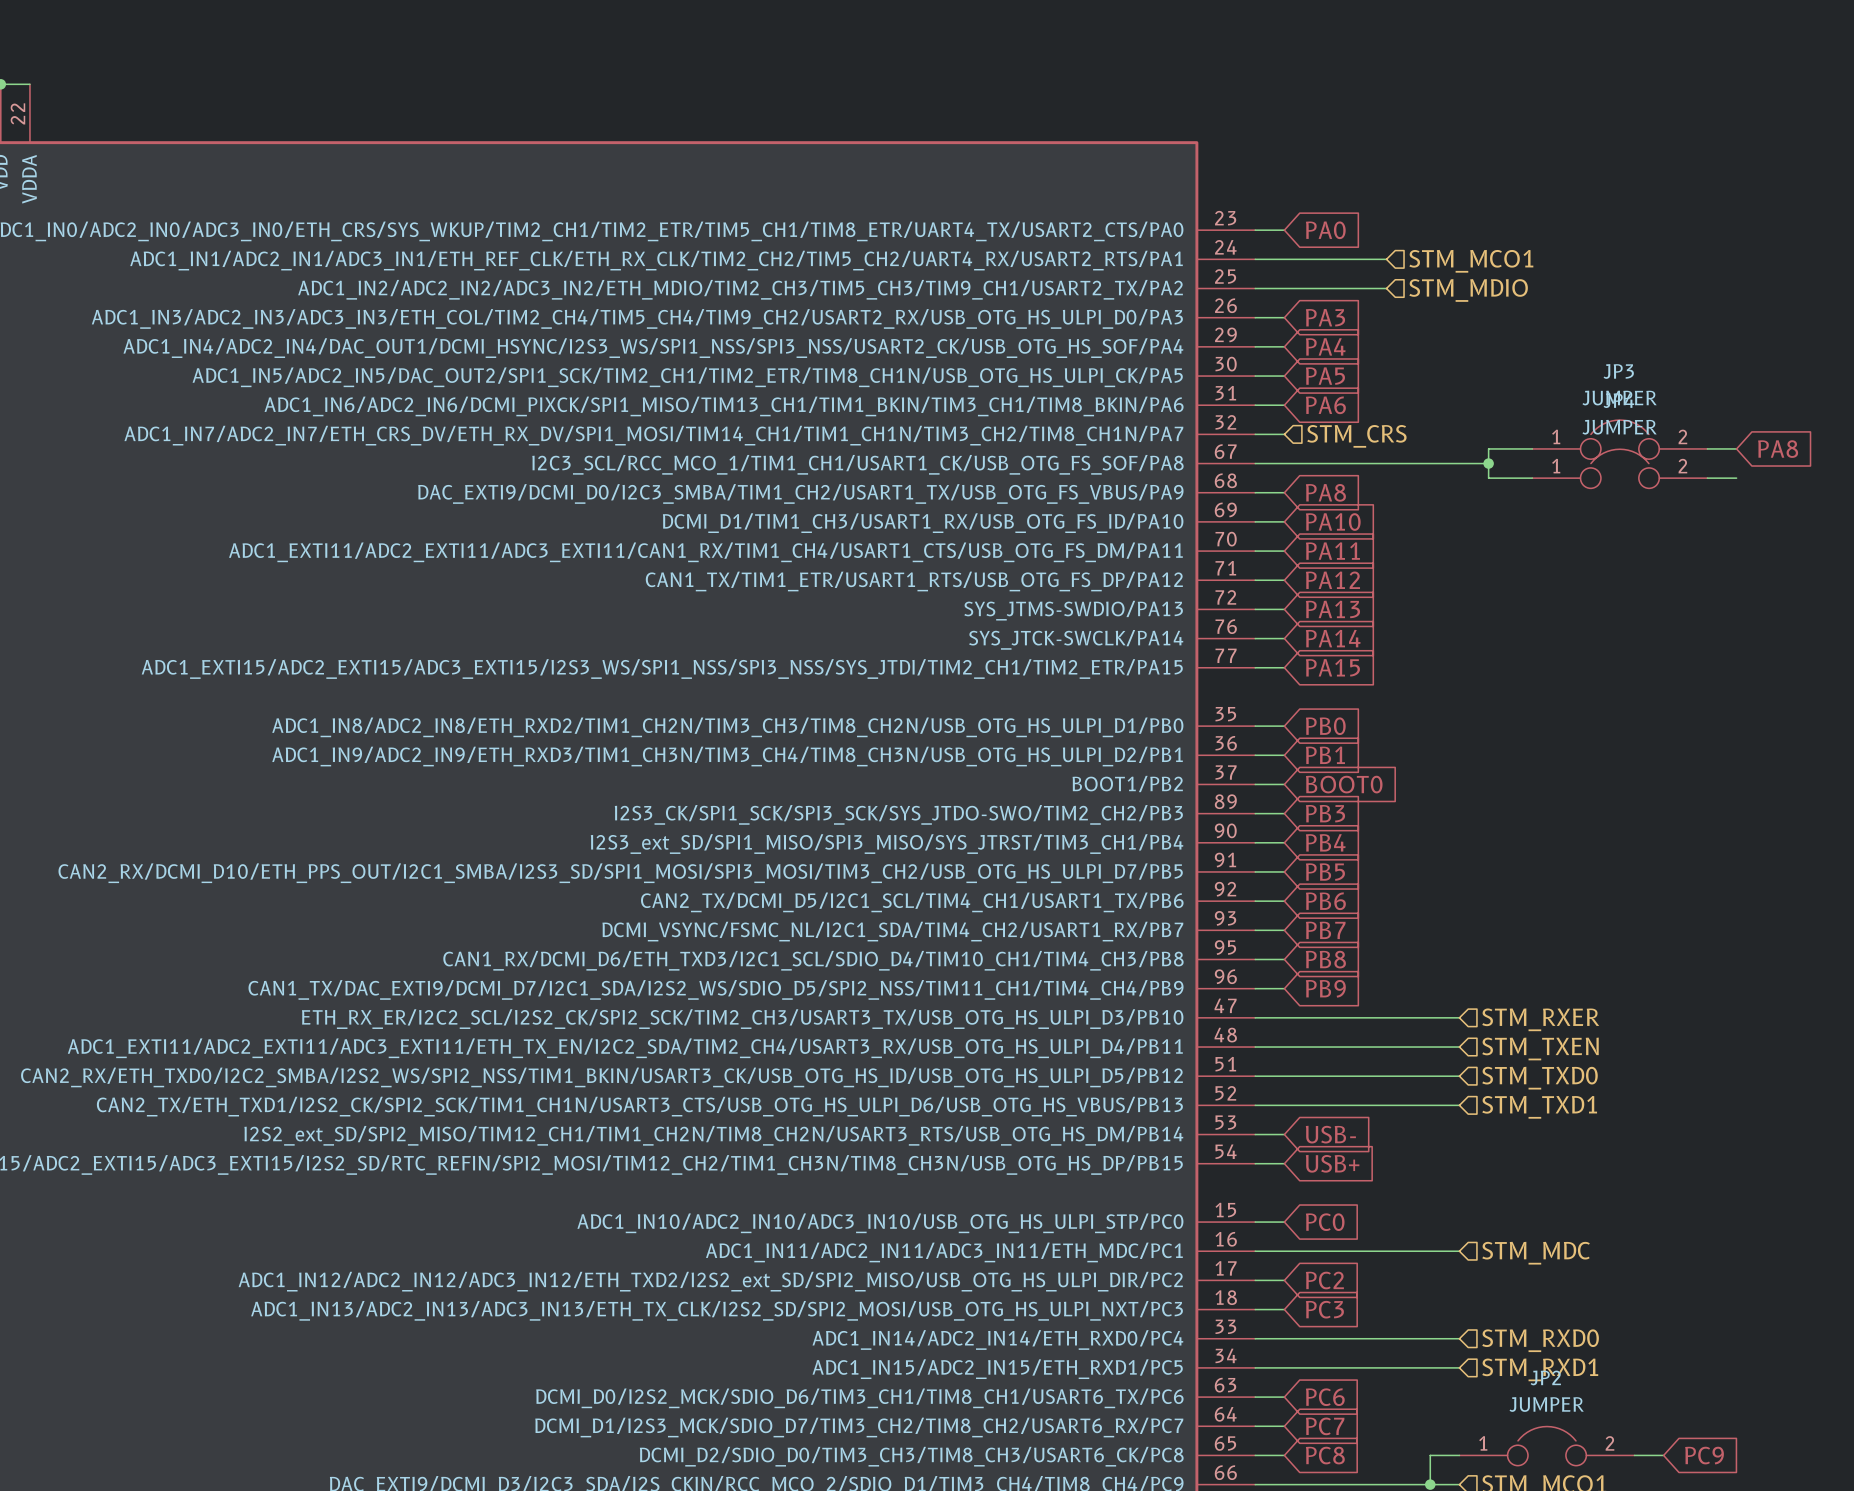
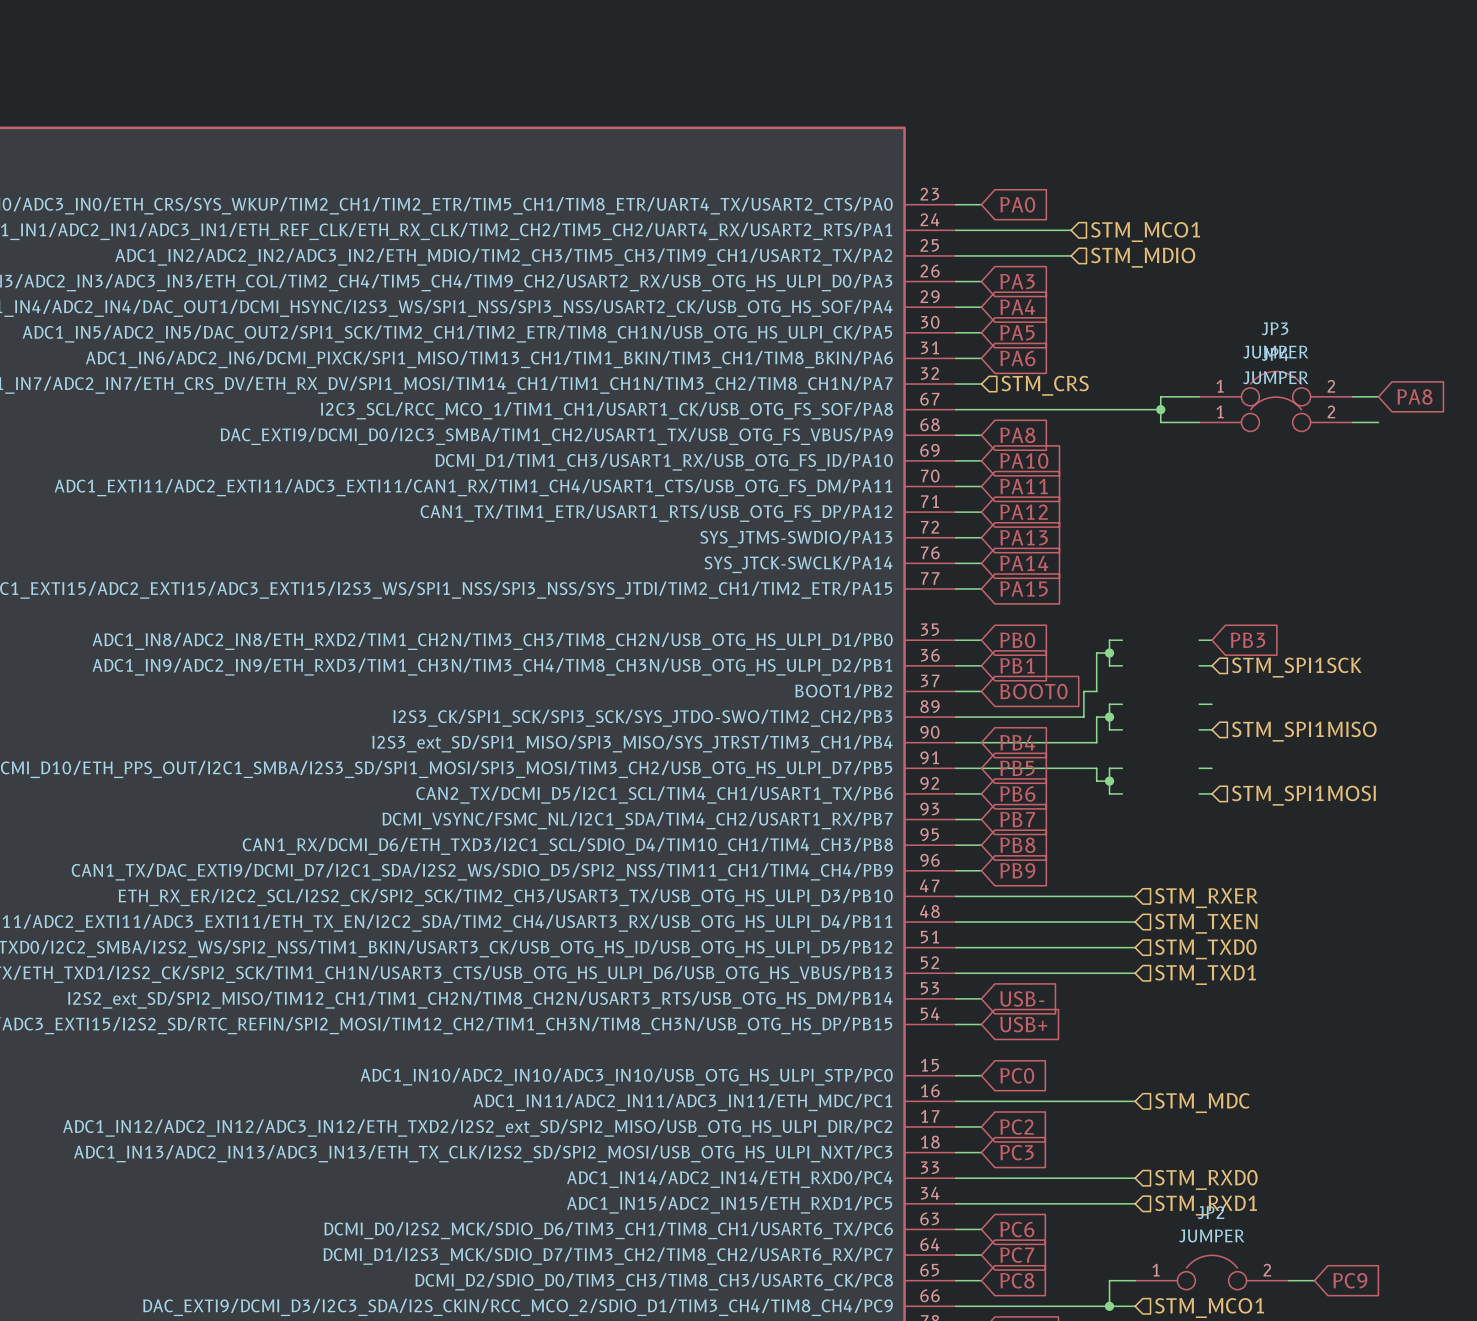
wire: none -> (1122, 640) (1109, 640) (1109, 665) (1122, 665)
wire: none -> (1199, 640) (1211, 640)
wire: none -> (1109, 653) (1096, 653) (1096, 691) (1083, 691) (1083, 717) (981, 717)
junction: none -> (1109, 653)
wire: none -> (1199, 665) (1211, 665)
hierarchical label: none -> STM_SPI1SCK (1296, 667)
wire: none -> (1122, 704) (1109, 704) (1109, 729) (1122, 729)
wire: none -> (1199, 704) (1211, 704)
global label position: PB3 (1325, 813) -> PB3 (1248, 640)
wire: none -> (1109, 717) (1096, 717) (1096, 742) (981, 742)
junction: none -> (1109, 717)
wire: none -> (1199, 729) (1211, 729)
hierarchical label: none -> STM_SPI1MISO (1304, 731)
wire: none -> (981, 768) (1096, 768) (1096, 781) (1109, 781)
wire: none -> (1122, 768) (1109, 768) (1109, 793) (1122, 793)
wire: none -> (1199, 768) (1211, 768)
junction: none -> (1109, 781)
wire: none -> (1199, 793) (1211, 793)
hierarchical label: none -> STM_SPI1MOSI (1303, 795)

